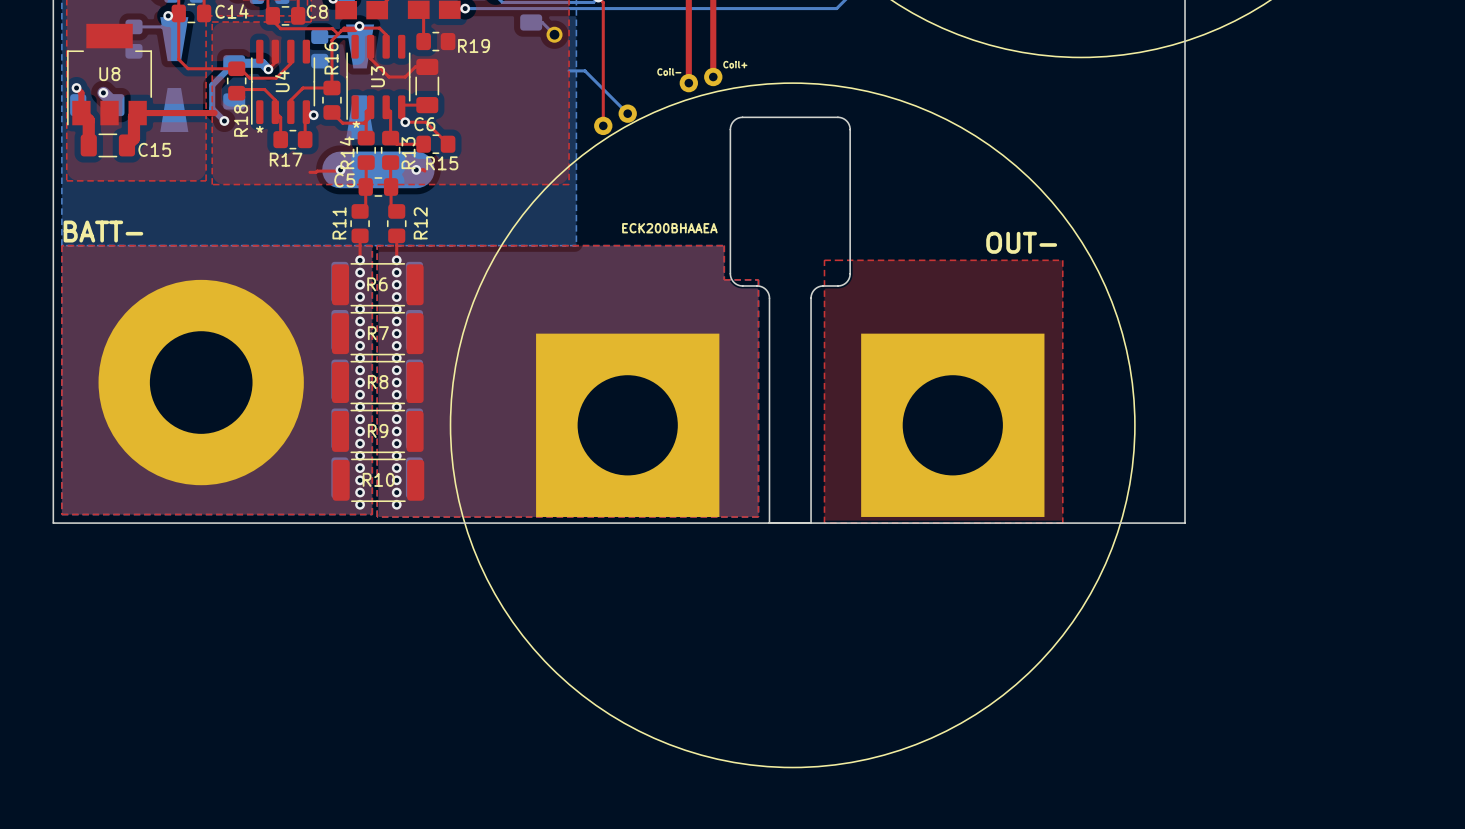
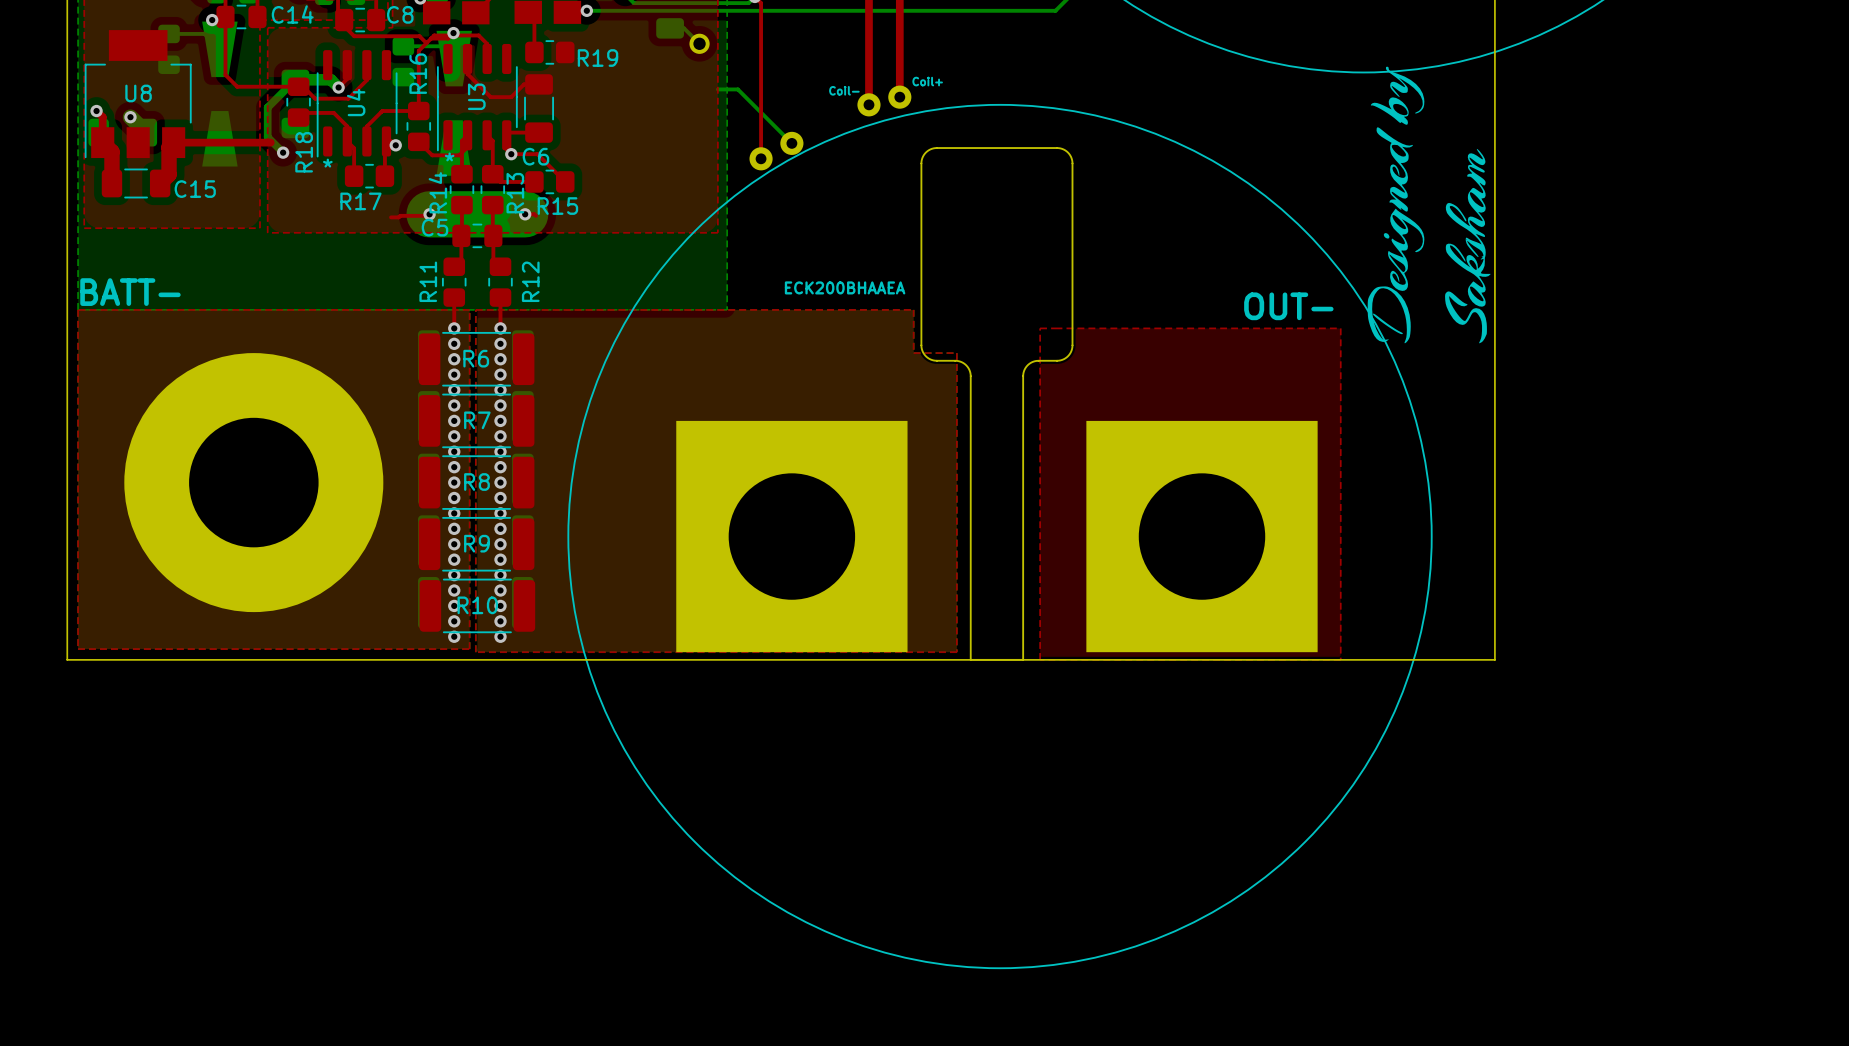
drawing: none -> [1367, 66, 1491, 344]

